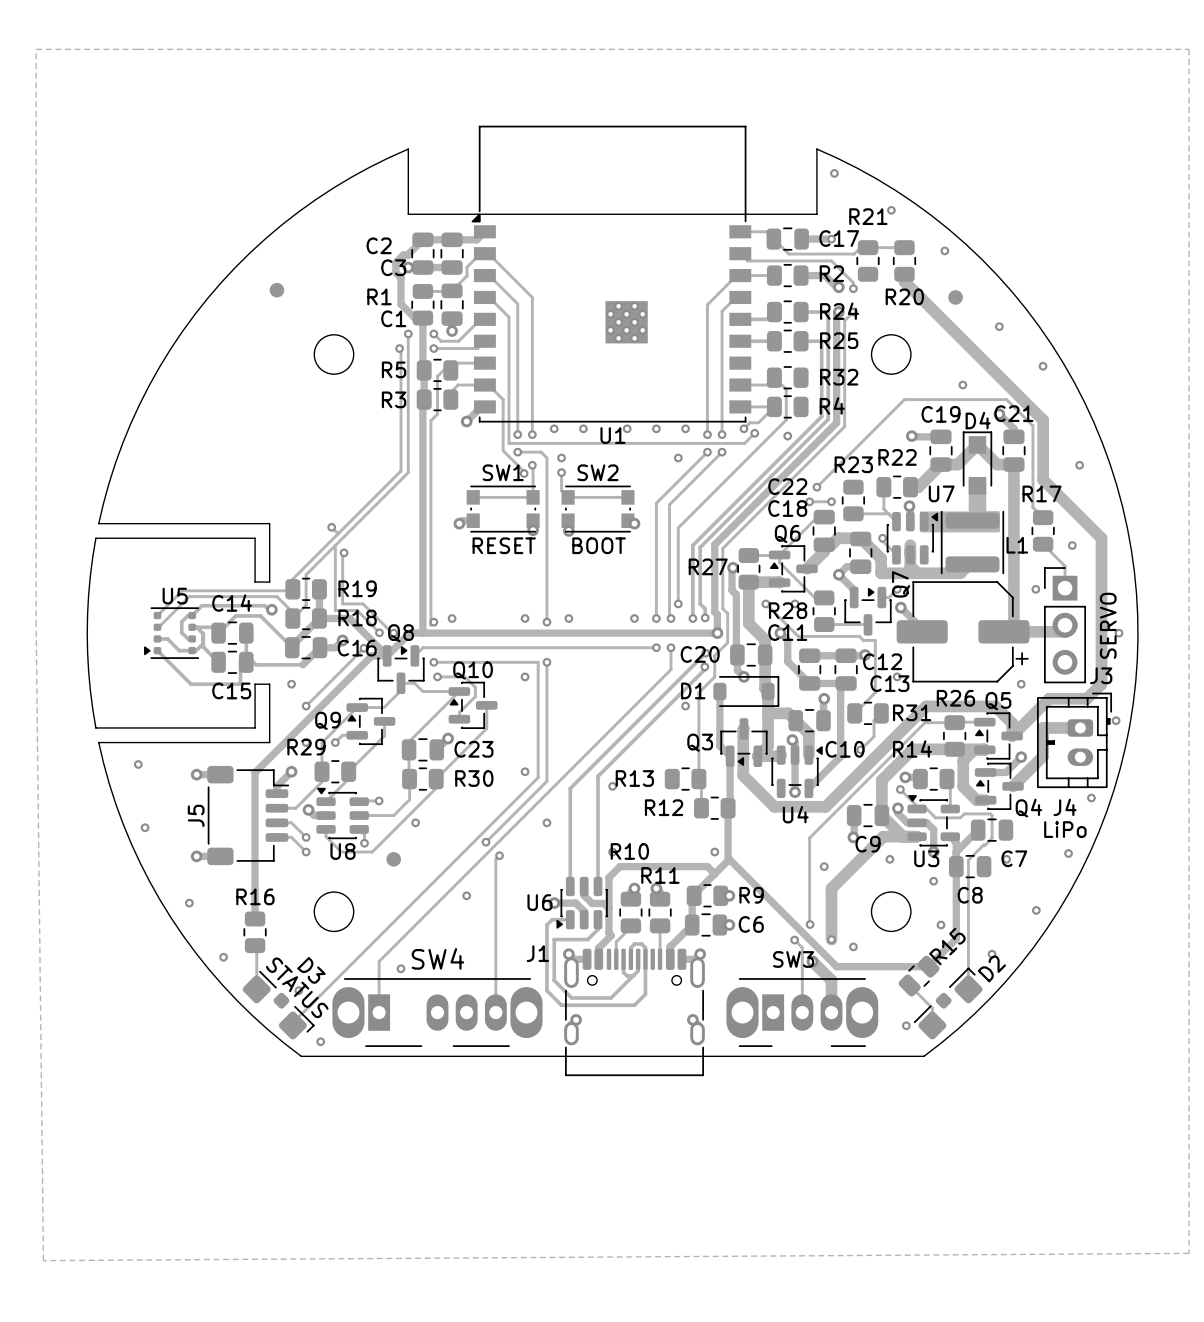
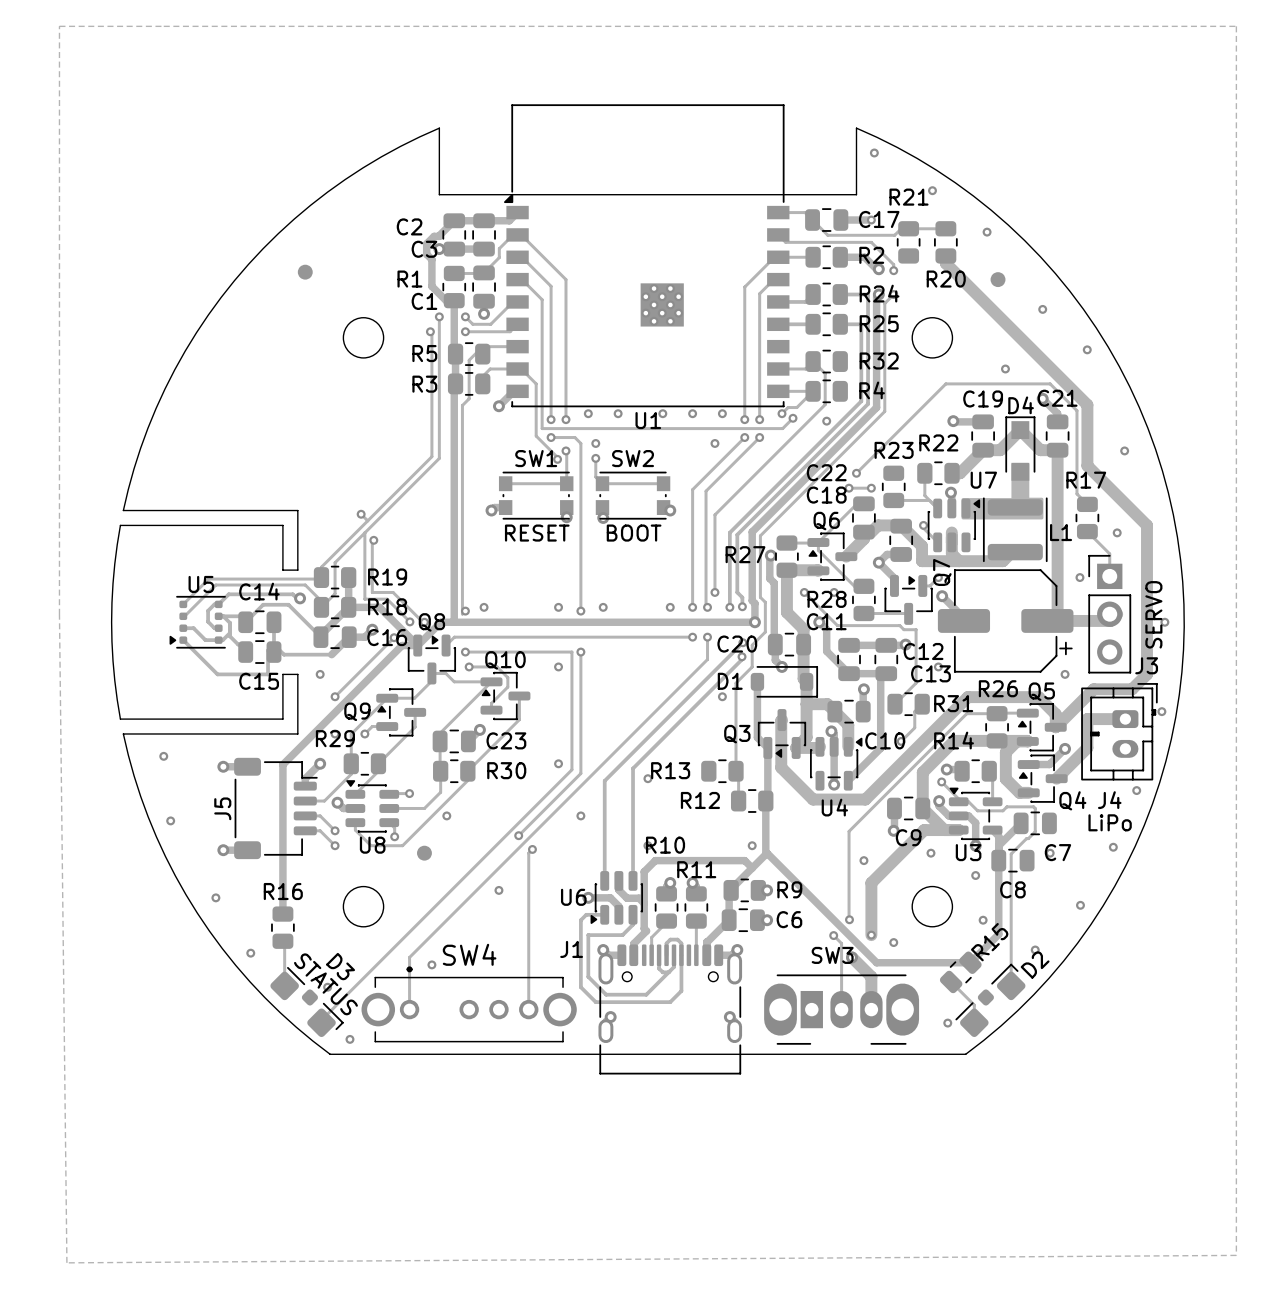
SW4 footprint: [332, 978, 543, 1048] -> [361, 966, 577, 1043]

